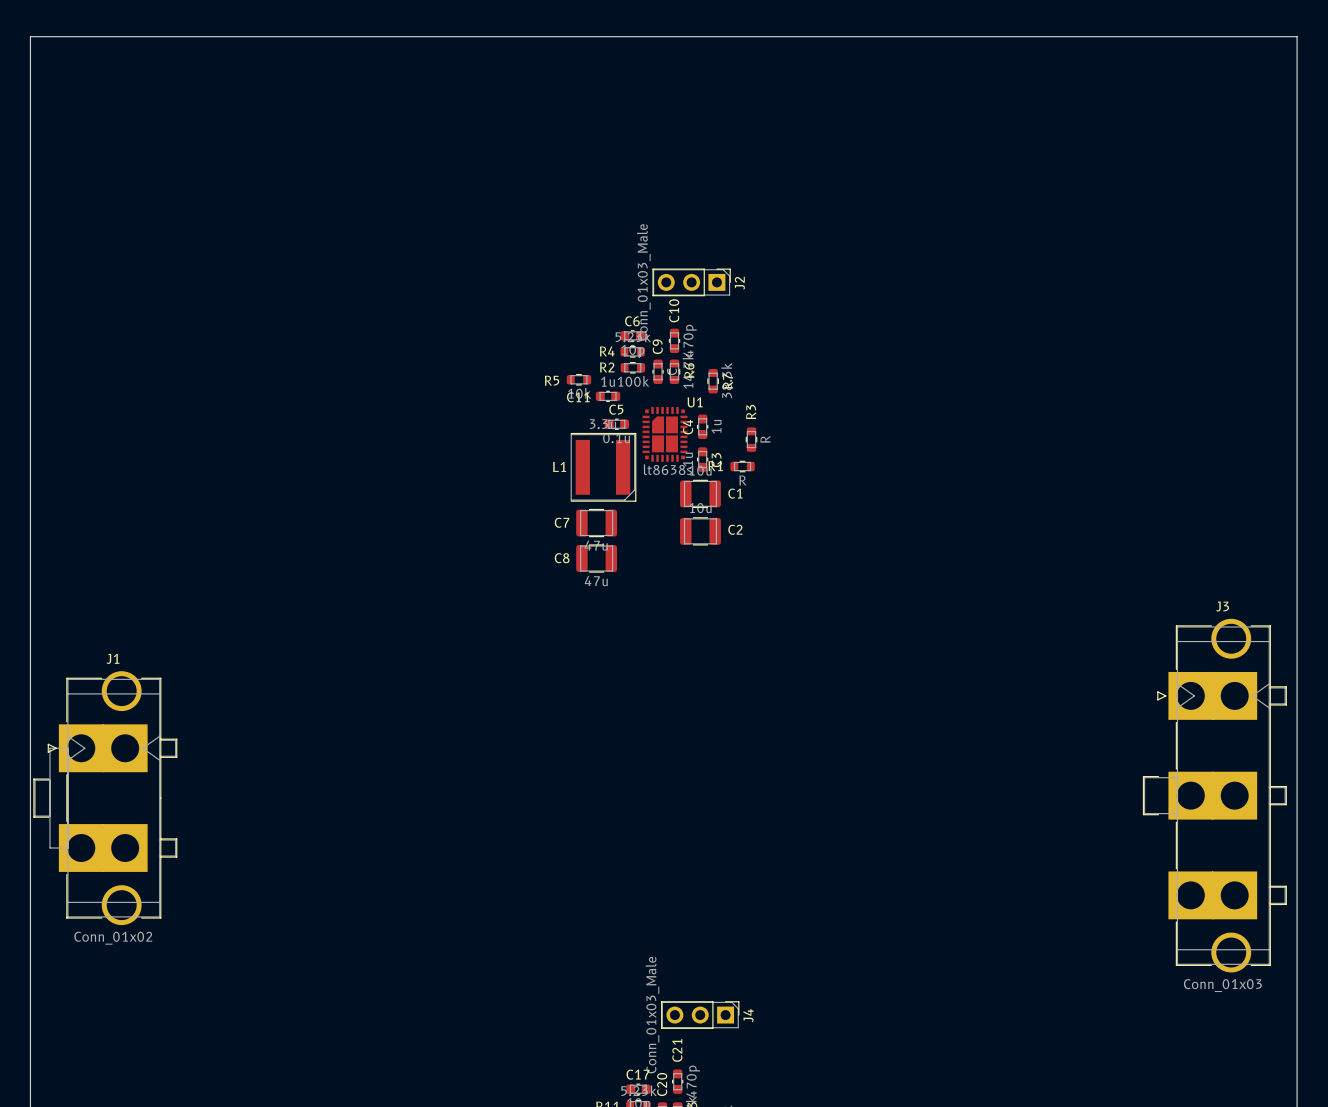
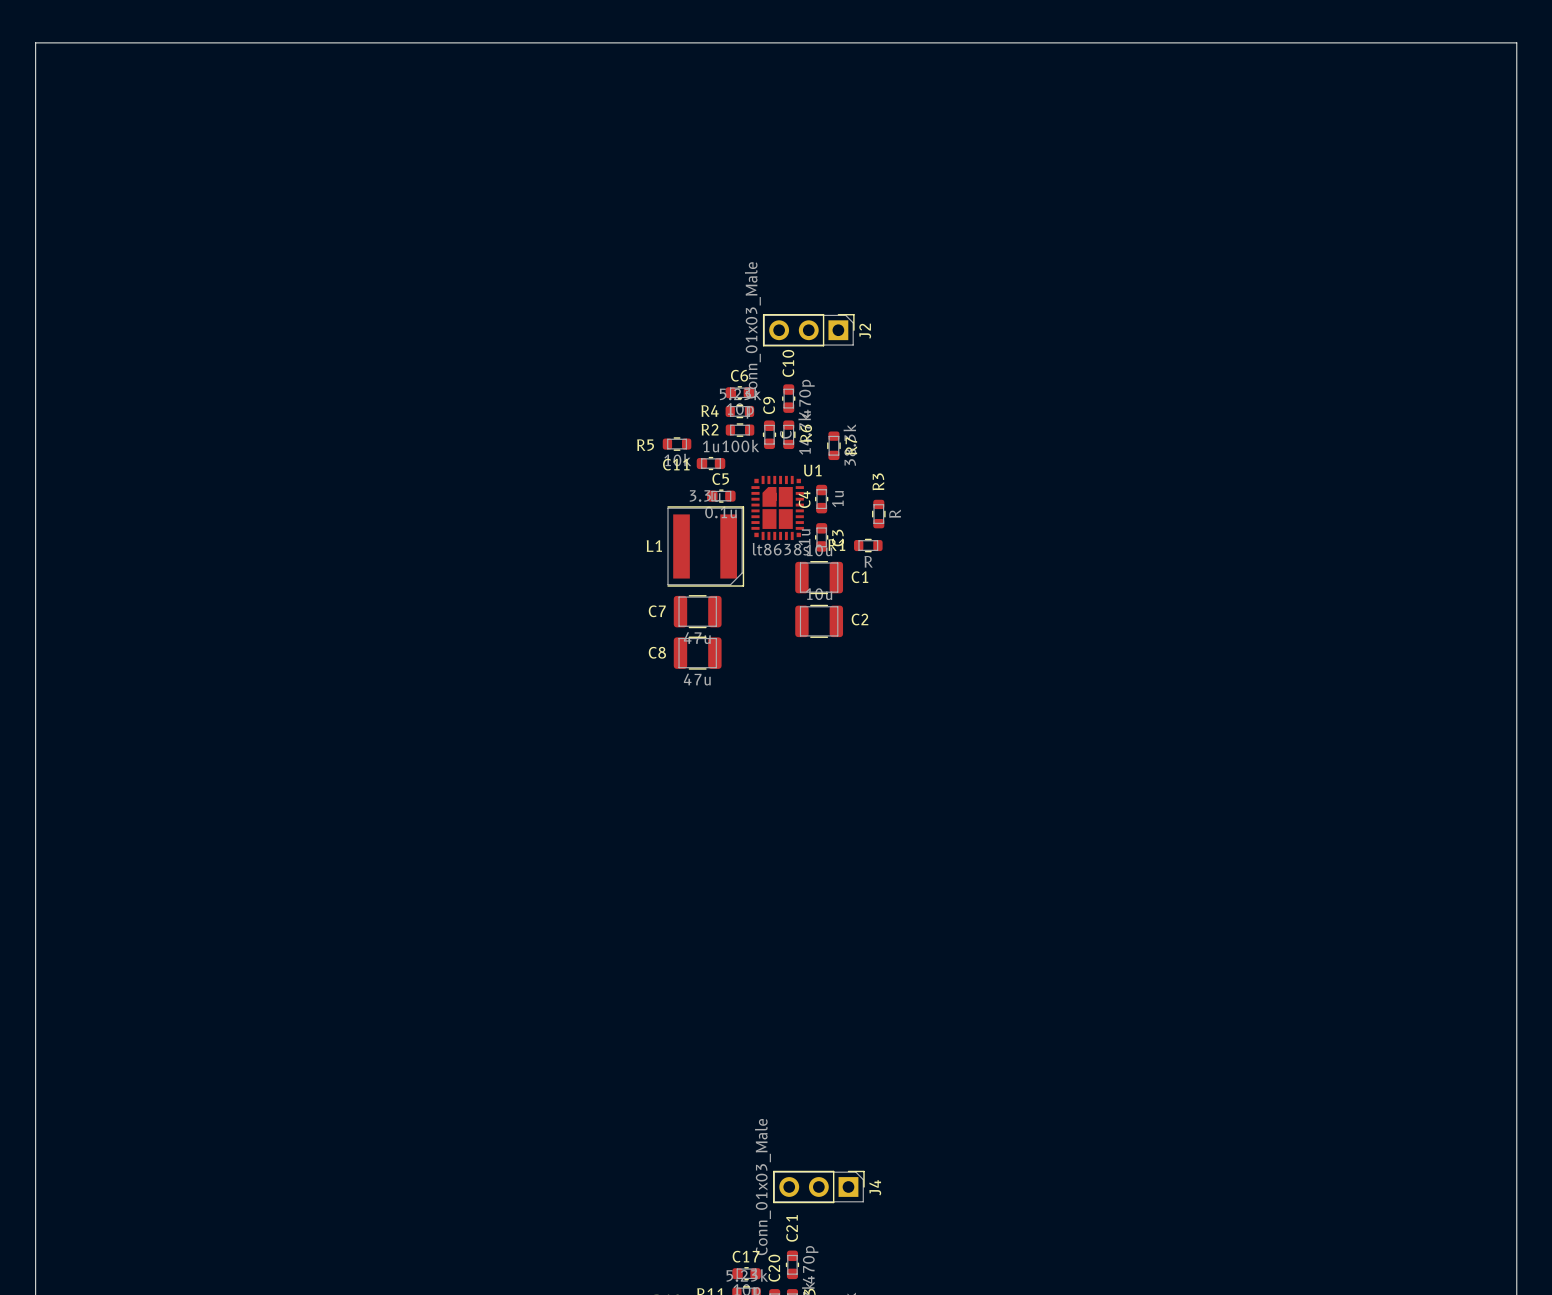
J3: Conn_01x03 (1214, 795) -> none
J1: Conn_01x02 (105, 798) -> none

